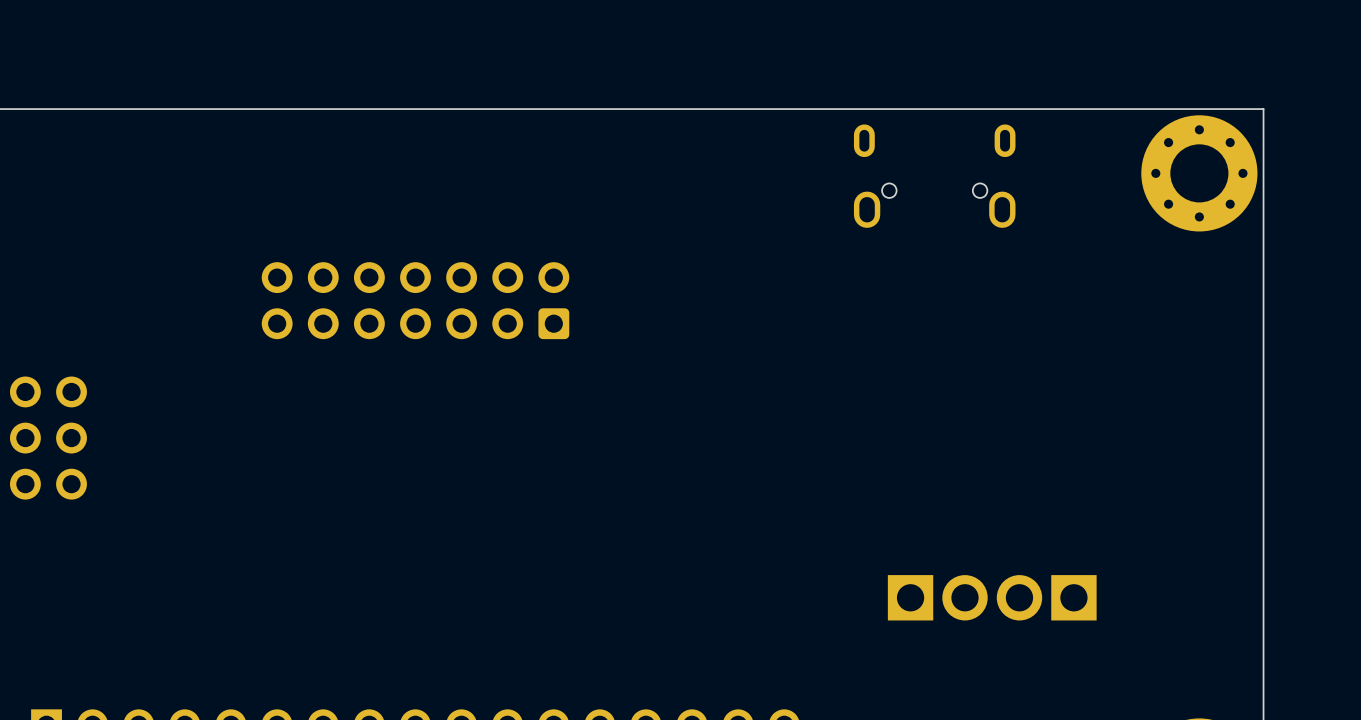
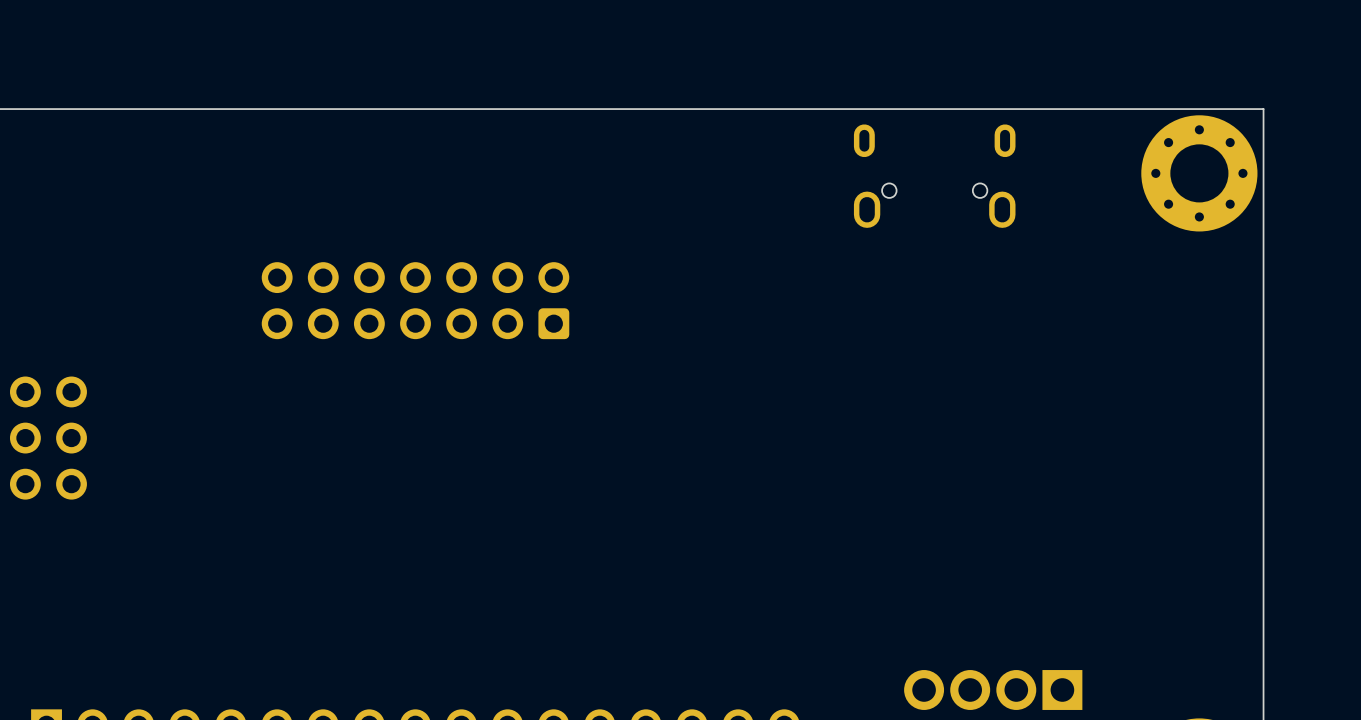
part: (992, 597) -> none
part: none -> (993, 690)

